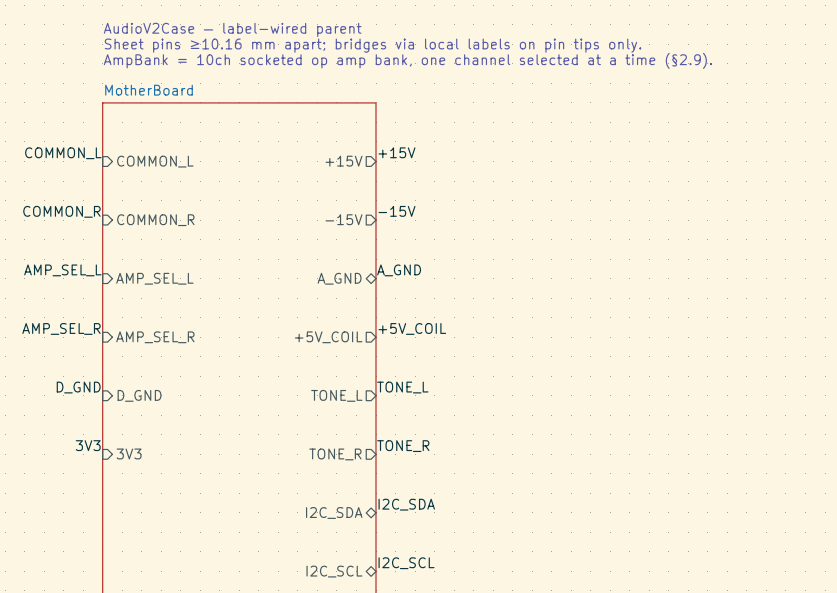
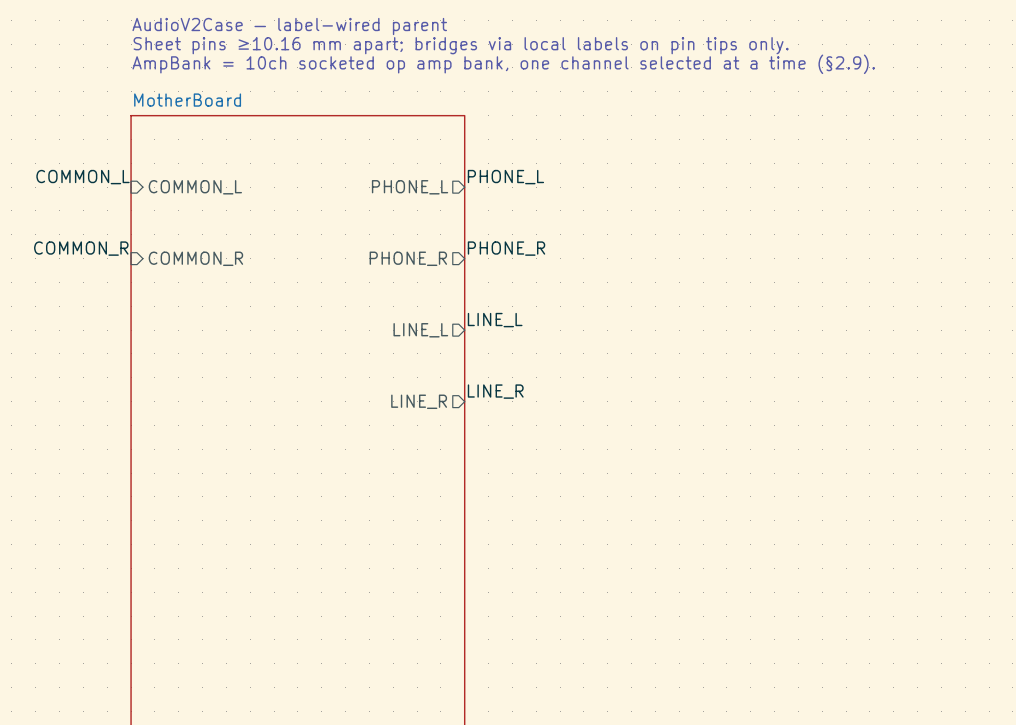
label: +15V (396, 152) -> PHONE_L (505, 177)
sheet pin: +15V (344, 161) -> PHONE_L (410, 187)
label: -15V (396, 211) -> PHONE_R (506, 248)
sheet pin: -15V (344, 219) -> PHONE_R (408, 258)
label: AMP_SEL_L (62, 270) -> none
label: A_GND (399, 270) -> LINE_L (495, 320)
sheet pin: AMP_SEL_L (154, 278) -> none
sheet pin shape: bidirectional (339, 278) -> output (420, 330)
sheet pin: A_GND (339, 278) -> LINE_L (420, 330)
label: AMP_SEL_R (61, 328) -> none
label: +5V_COIL (412, 328) -> LINE_R (495, 391)
sheet pin: AMP_SEL_R (155, 337) -> none
sheet pin: +5V_COIL (328, 337) -> LINE_R (419, 401)
label: D_GND (78, 387) -> none
label: TONE_L (402, 387) -> none
sheet pin: D_GND (139, 395) -> none
sheet pin: TONE_L (336, 395) -> none
label: 3V3 (88, 445) -> none
label: TONE_R (403, 446) -> none
sheet pin: 3V3 (129, 453) -> none
sheet pin: TONE_R (335, 454) -> none
label: I2C_SDA (406, 504) -> none
sheet pin: I2C_SDA (334, 513) -> none
label: I2C_SCL (406, 563) -> none
sheet pin: I2C_SCL (334, 571) -> none

